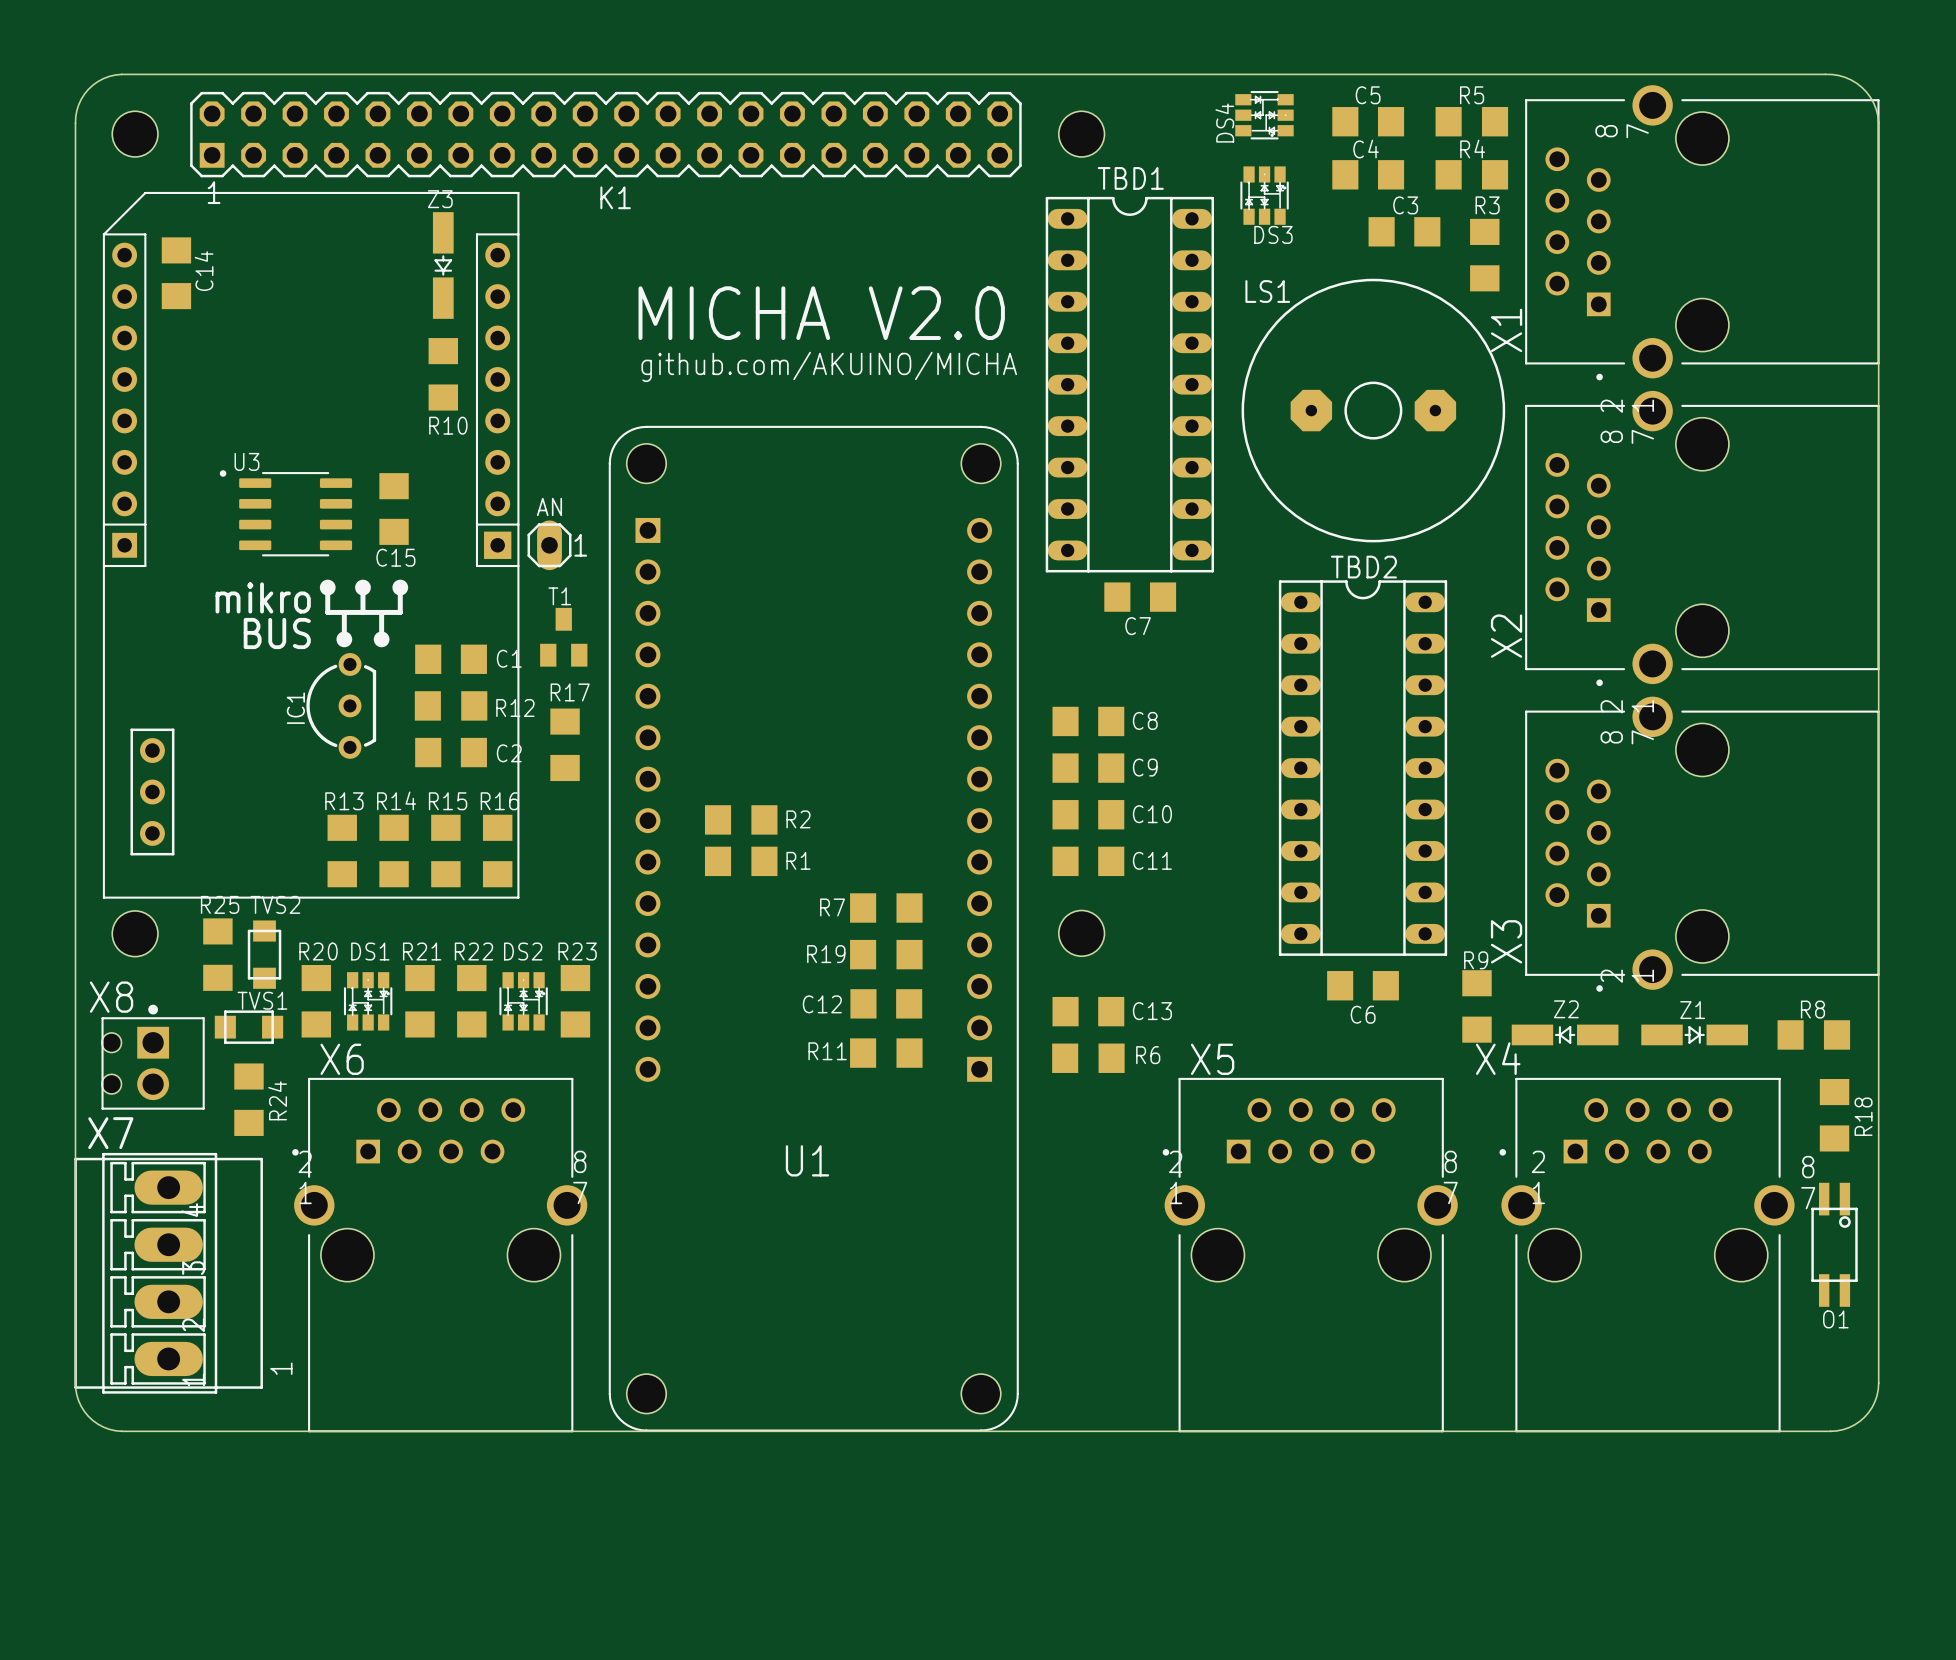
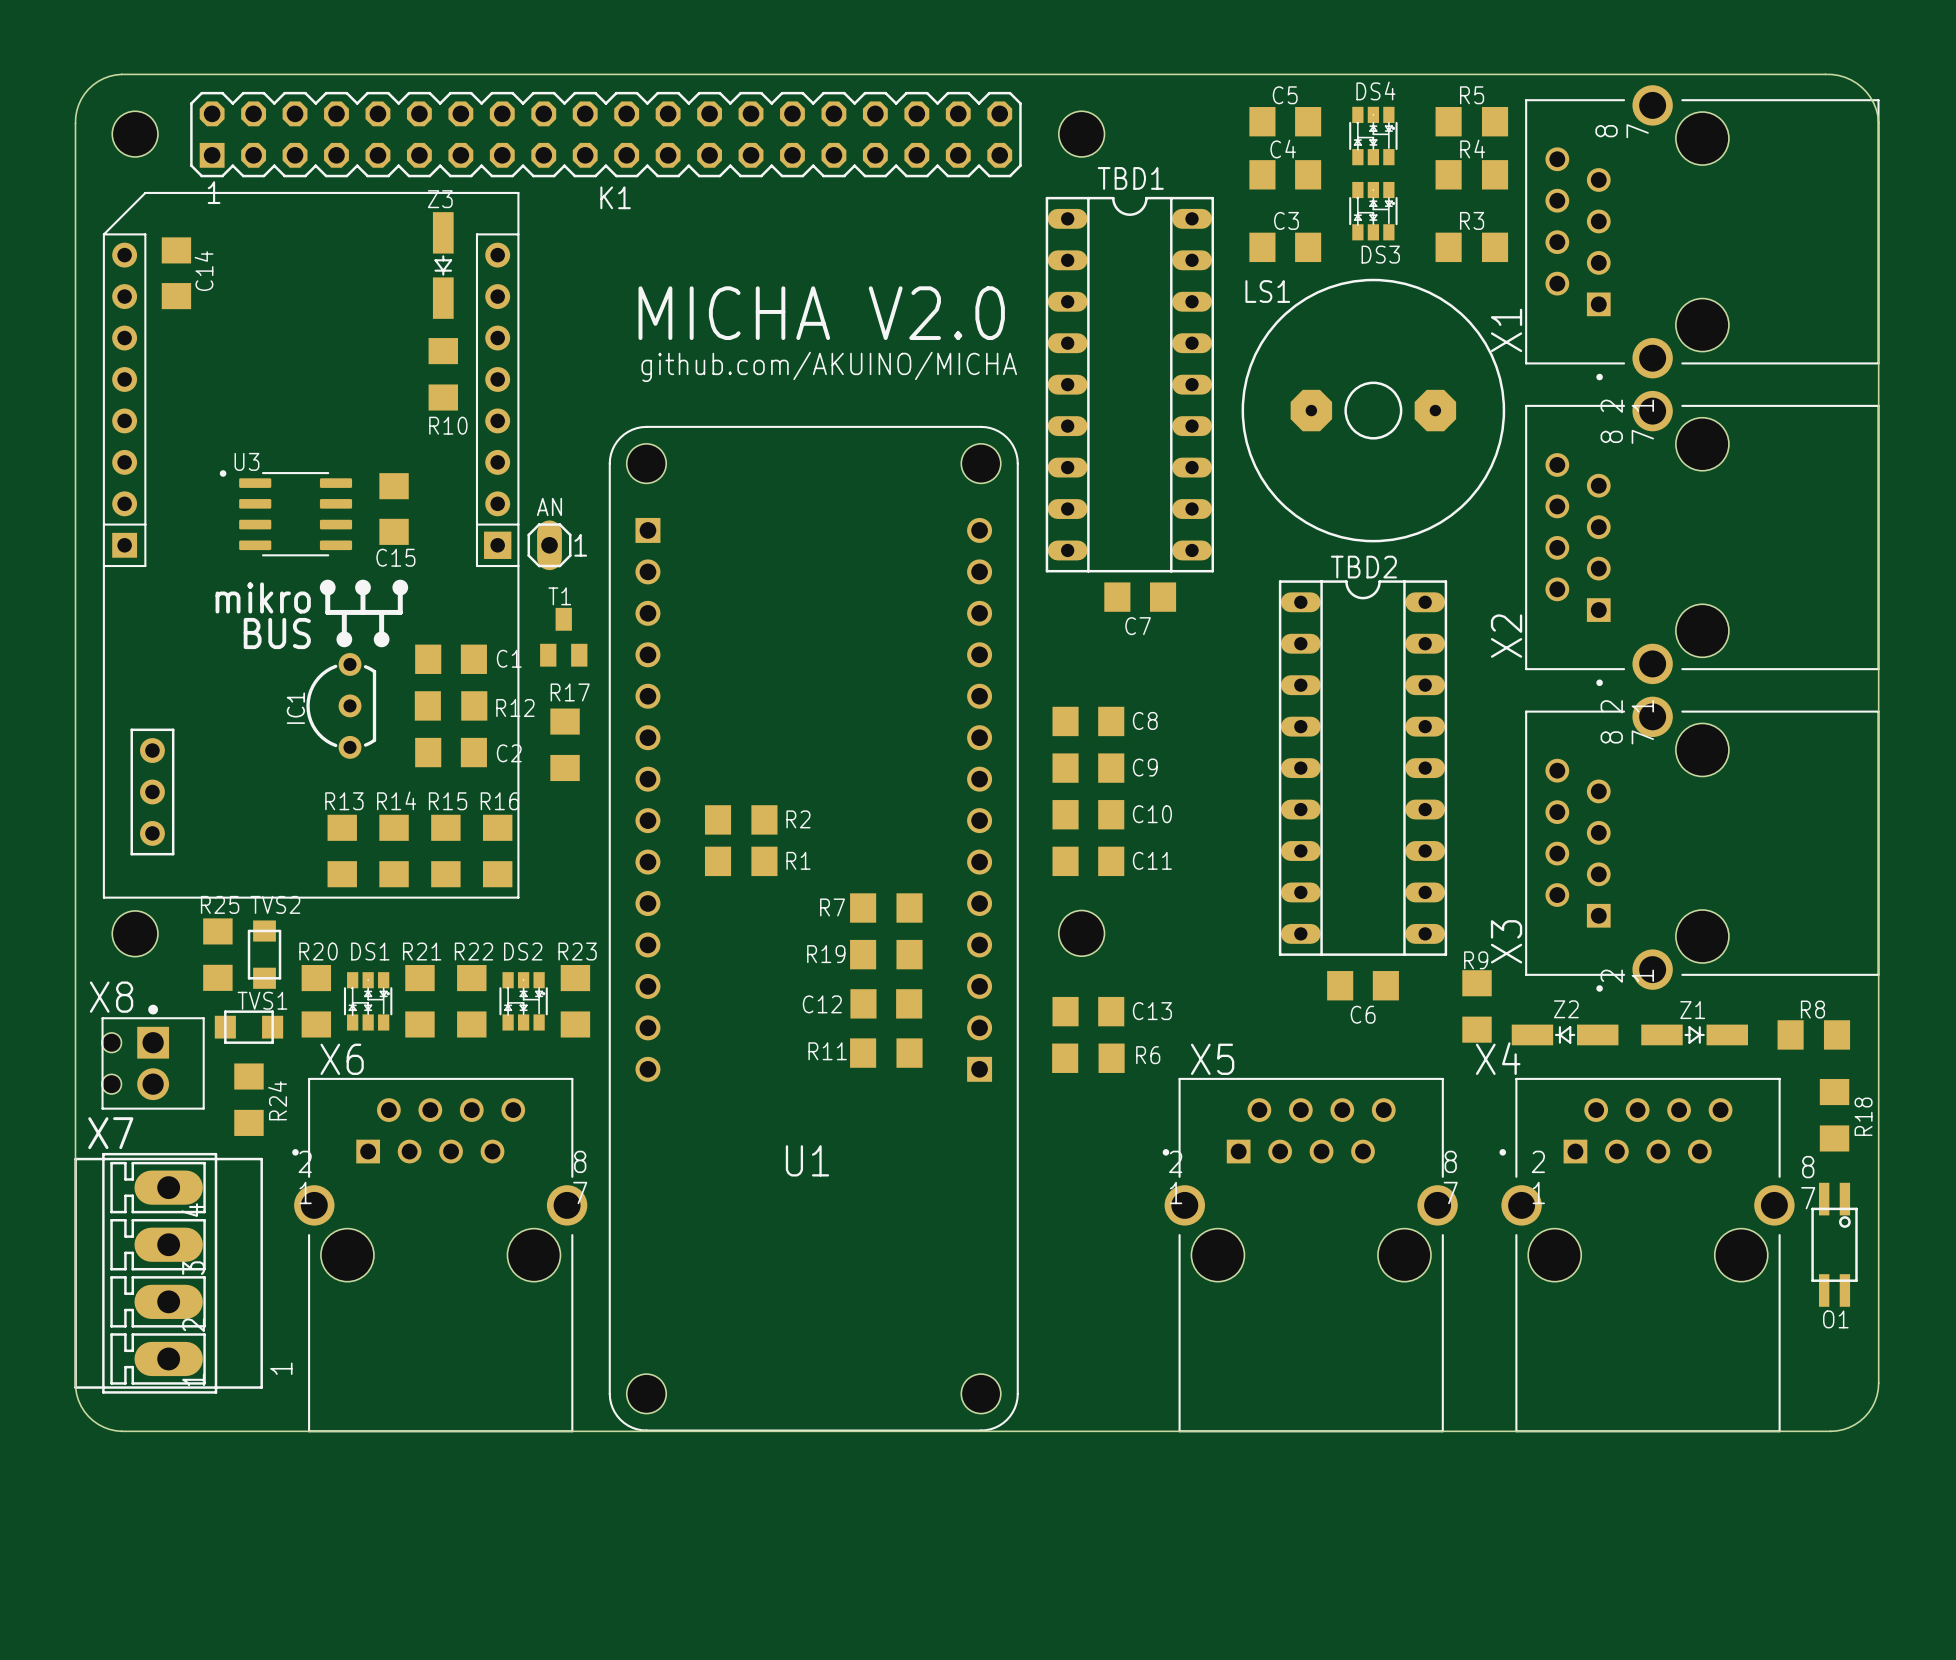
DS4 rotation: 0° (1264, 115) -> 90° counterclockwise (1373, 136)
DS4 position: (1264, 115) -> (1373, 136)
C5 position: (1368, 121) -> (1285, 121)
DS4 name position: DS4 (1224, 123) -> DS4 (1375, 90)
C4 position: (1368, 174) -> (1285, 174)
DS3 position: (1264, 195) -> (1373, 211)
C3 position: (1404, 231) -> (1285, 247)
DS3 name position: DS3 (1273, 234) -> DS3 (1380, 254)
R3 rotation: 0° (1484, 255) -> 90° clockwise (1471, 247)

